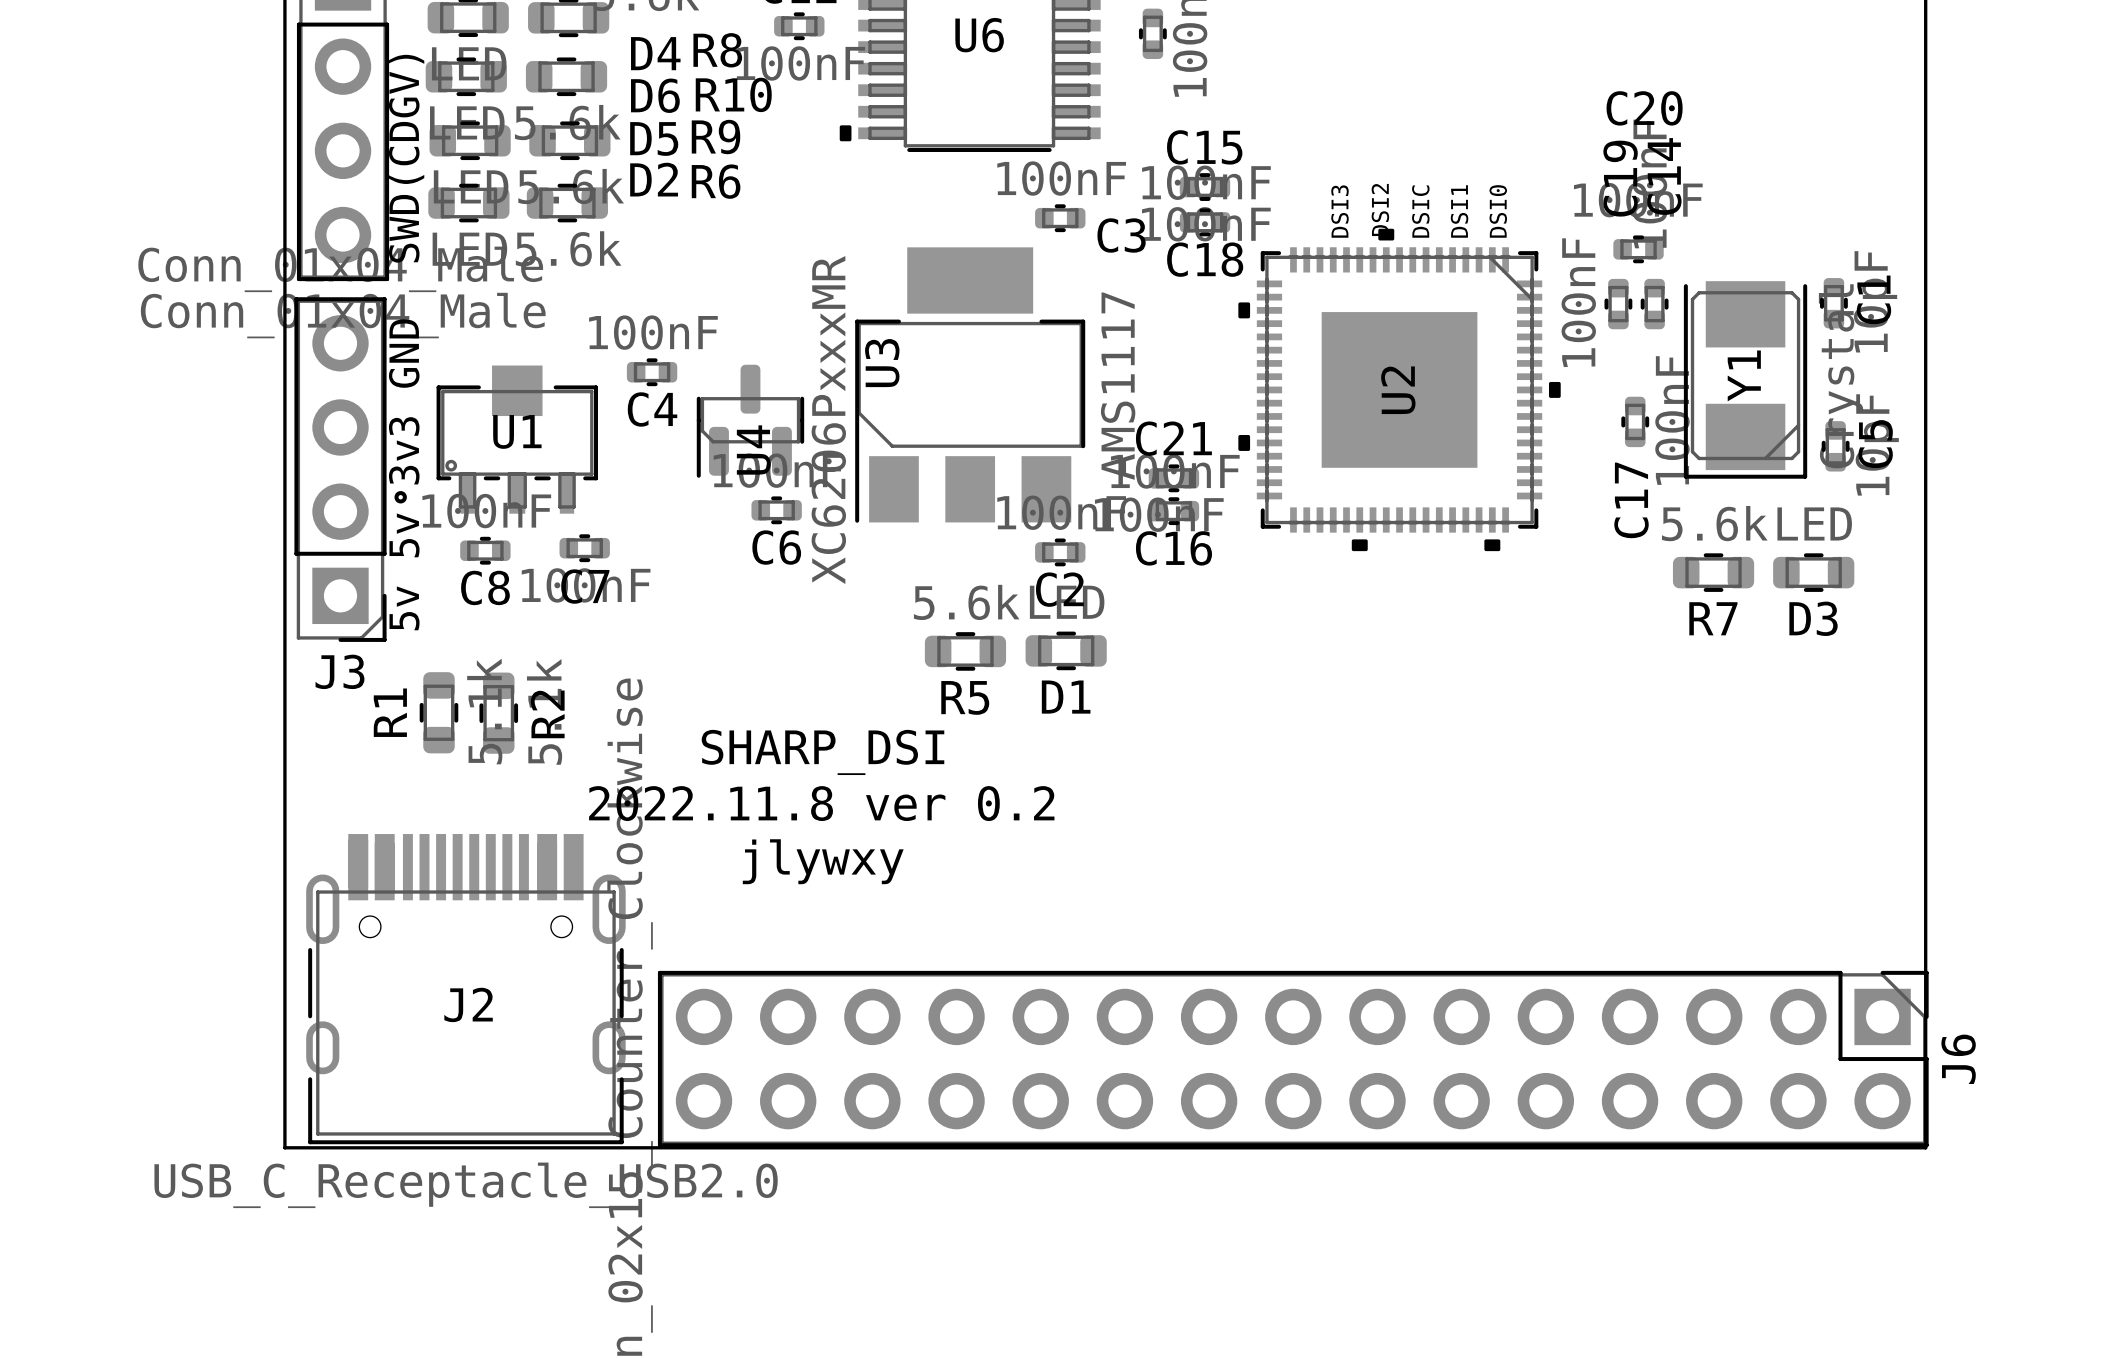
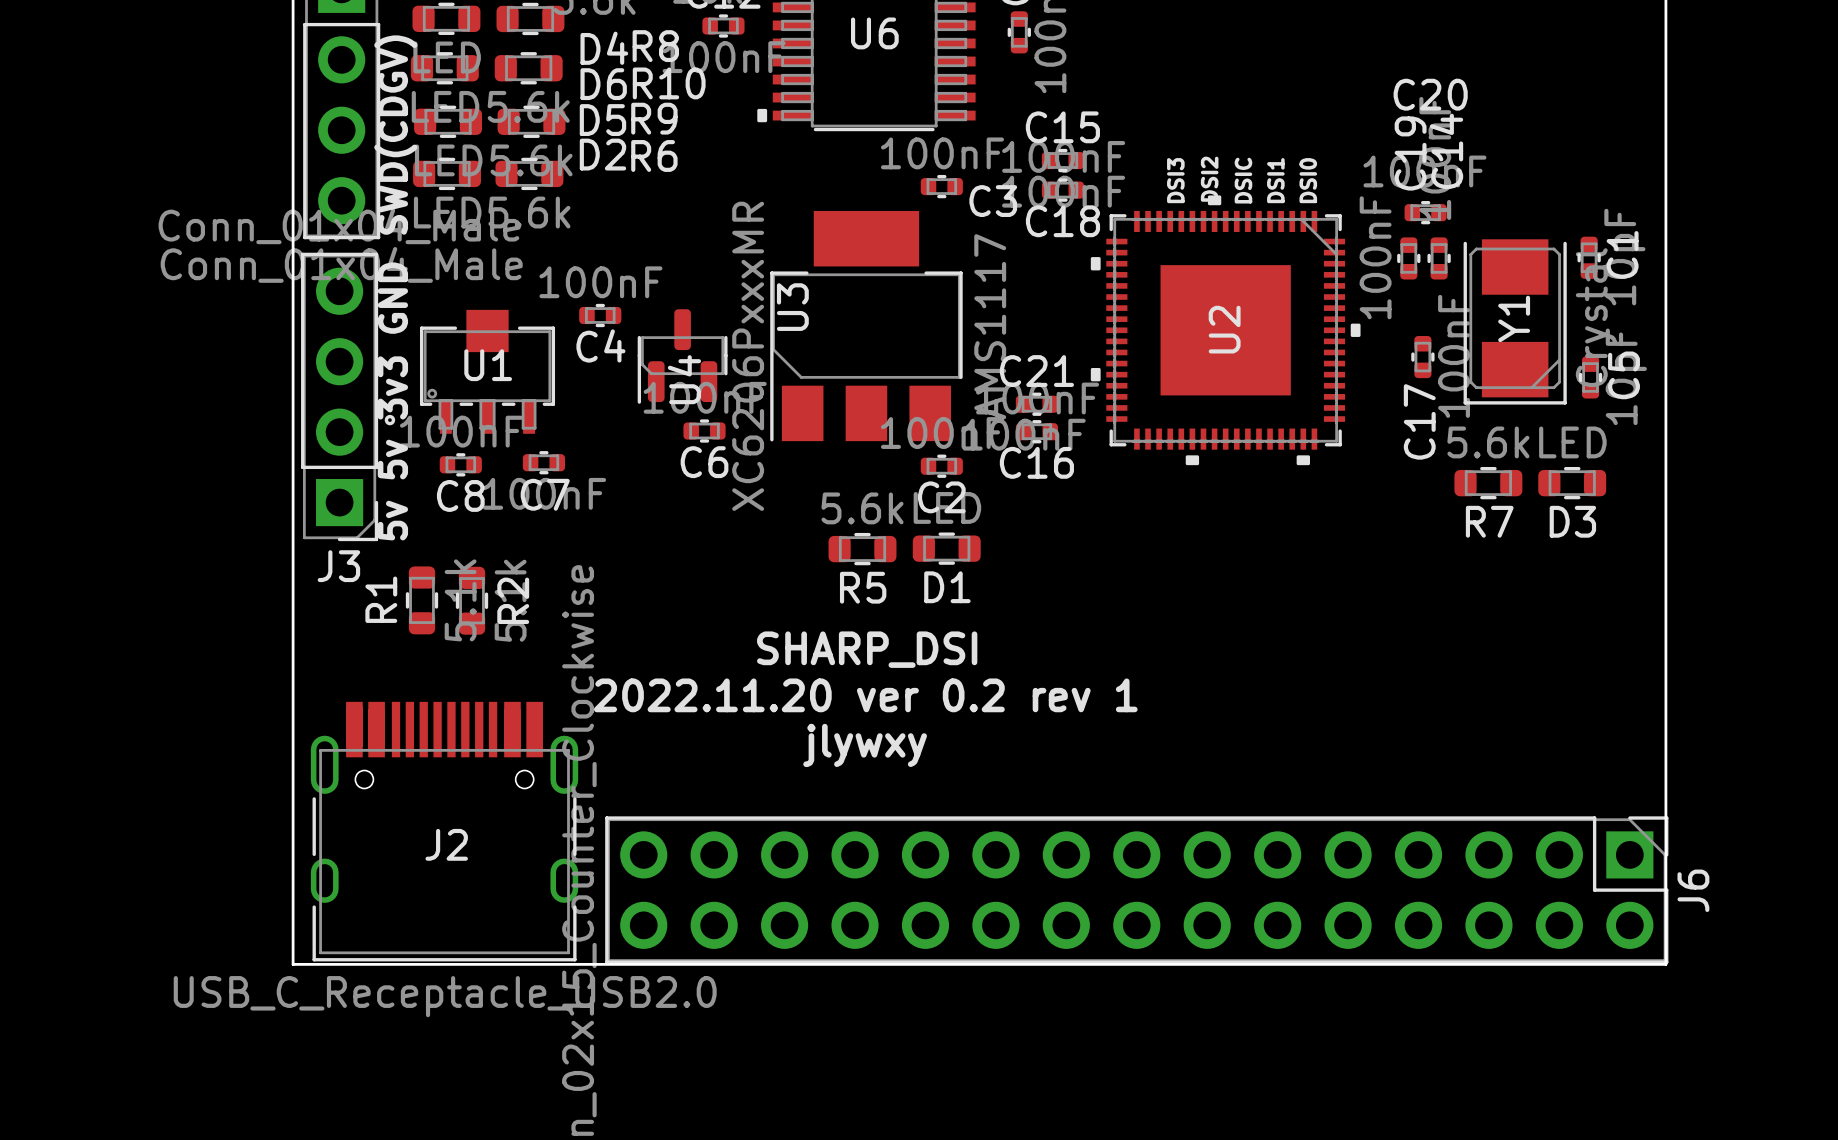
text position: SHARP_DSI (822, 752) -> SHARP_DSI (867, 649)
text: 2022.11.8 ver 0.2 (821, 803) -> 2022.11.20 ver 0.2 rev 1 (865, 695)
text position: jlywxy (823, 861) -> jlywxy (865, 745)

